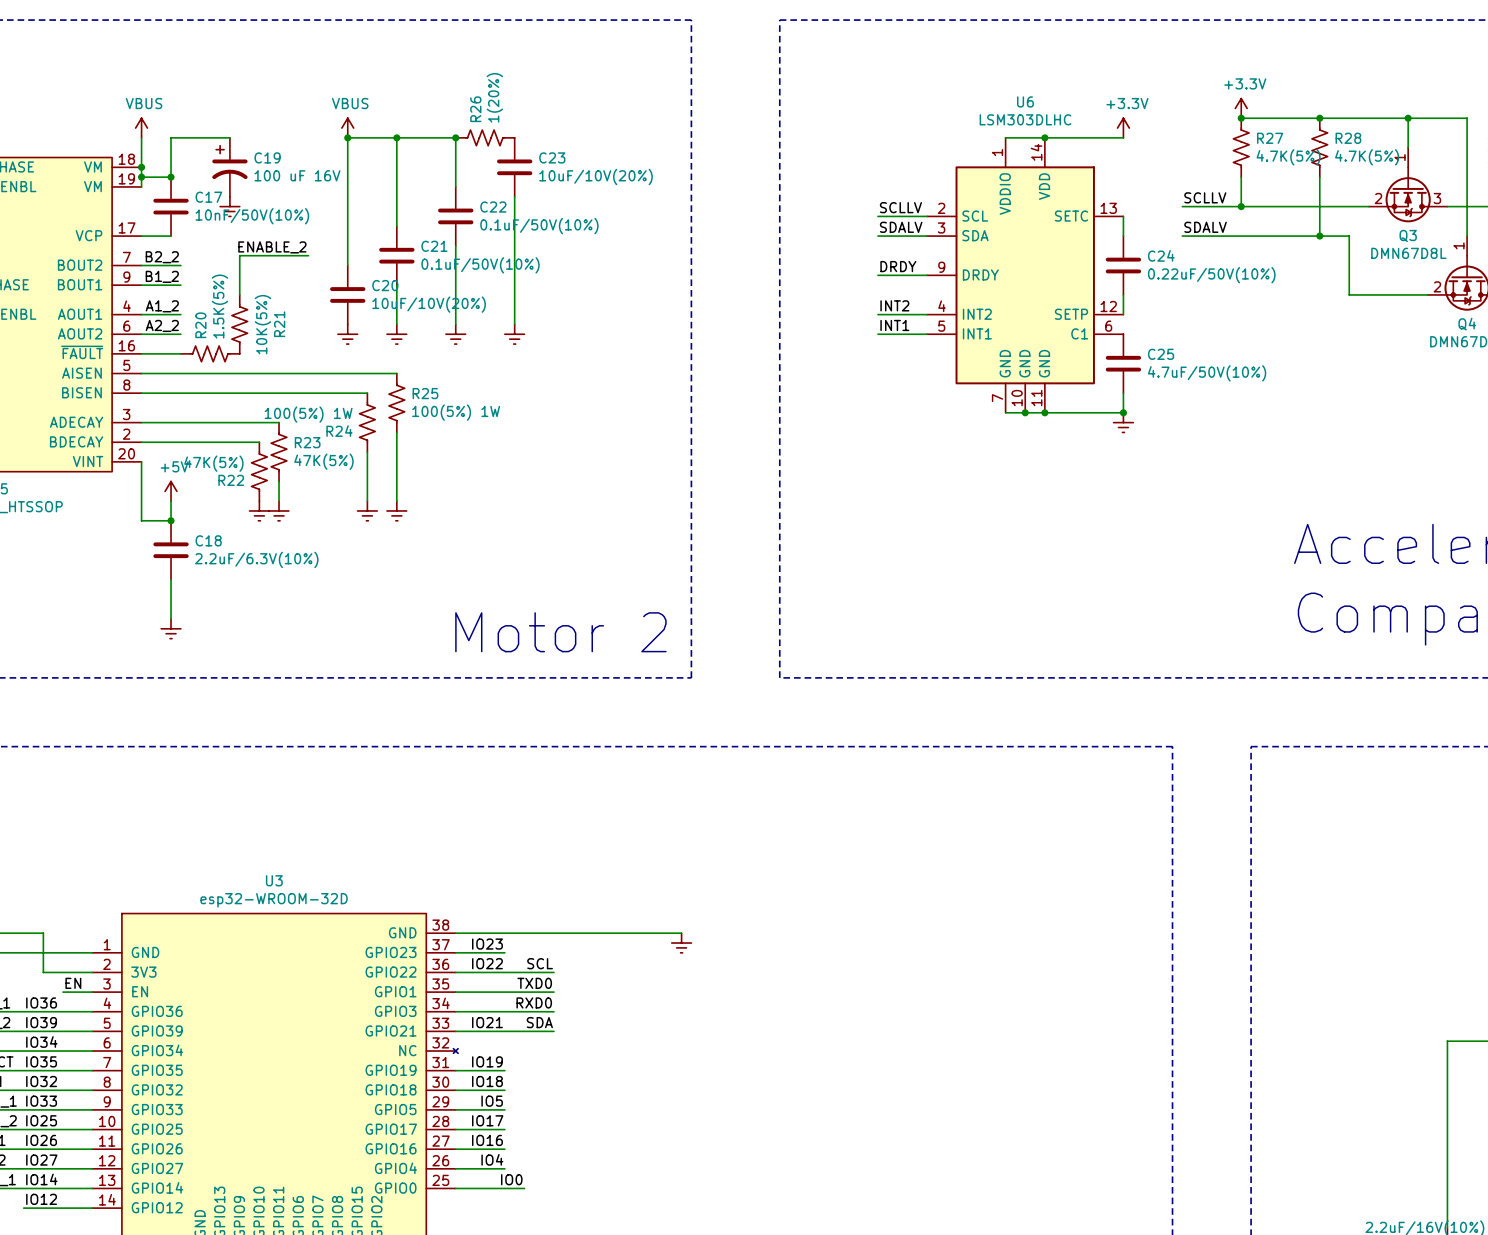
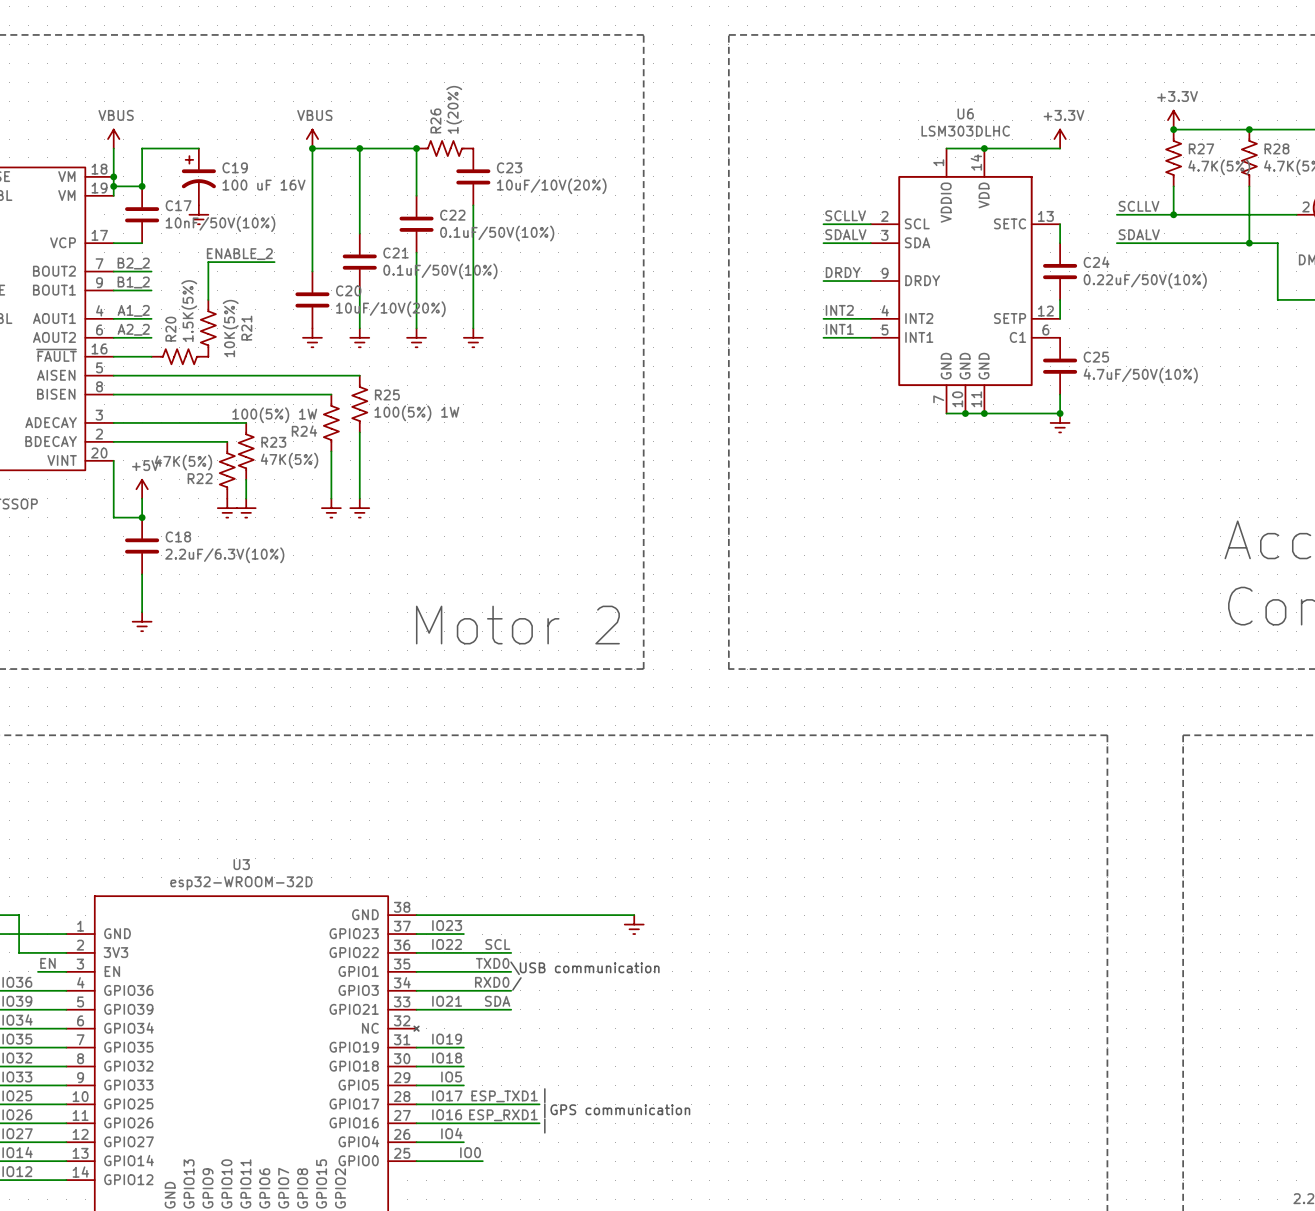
text: none -> \USB communication (584, 968)
text: none -> / (516, 983)
text: none -> | (544, 1095)
label: none -> ESP_TXD1 (504, 1096)
wire: none -> (463, 1104) (539, 1104)
text: none -> |GPS communication (617, 1110)
label: none -> ESP_RXD1 (503, 1115)
wire: none -> (463, 1123) (539, 1123)
text: none -> | (544, 1126)

